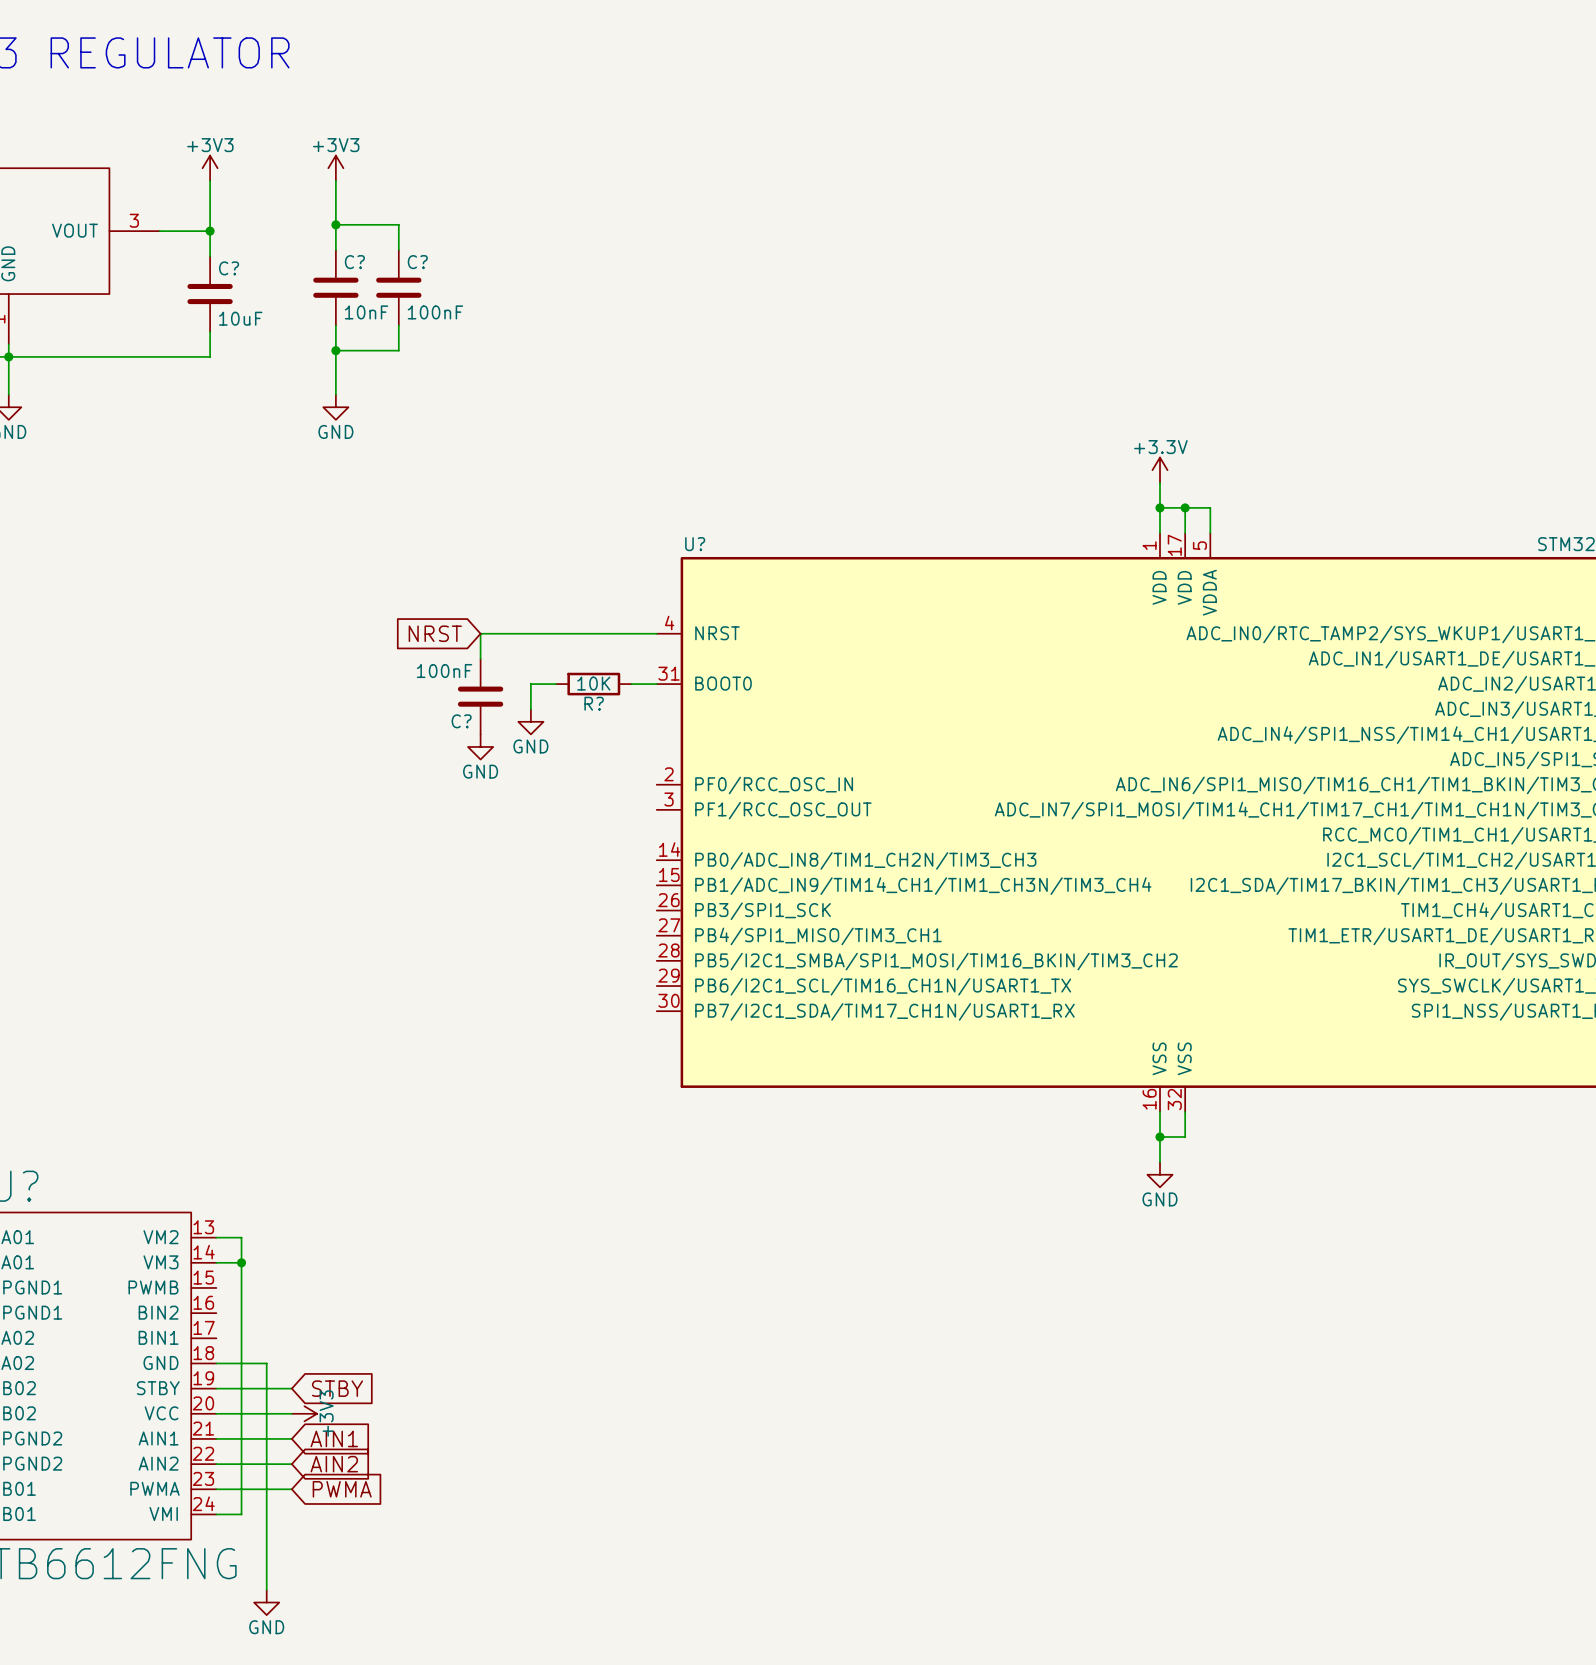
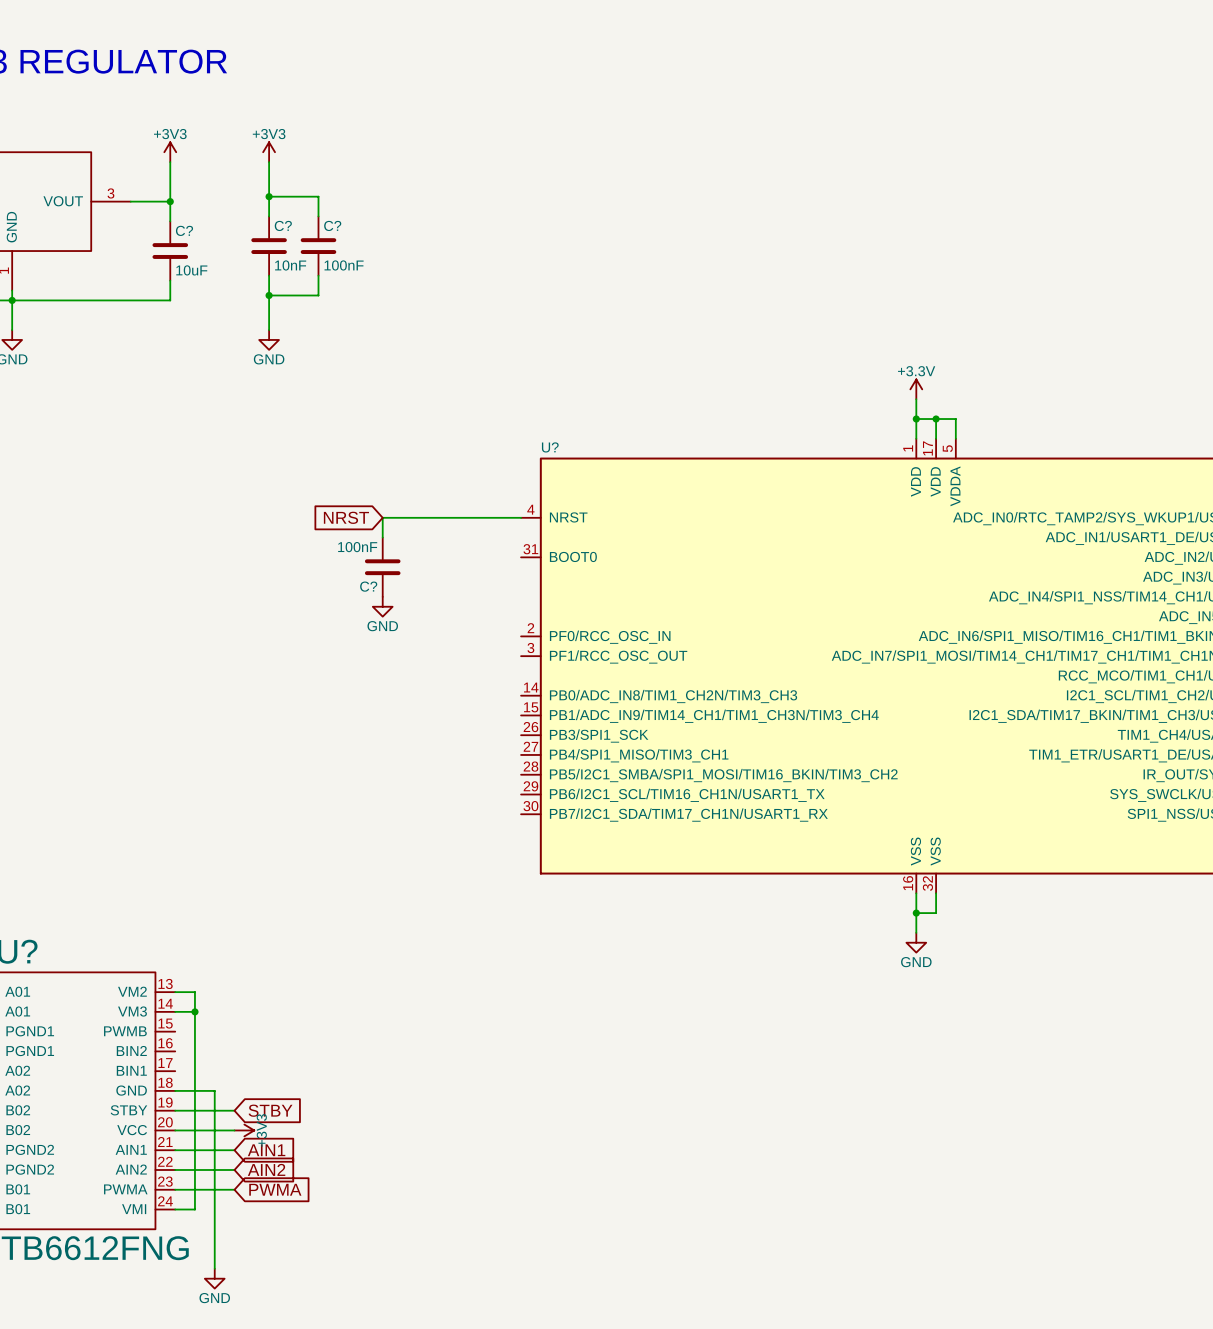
wire: (556, 684) (530, 684) (530, 709) -> none
R?: 10K (593, 684) -> none
wire: (631, 684) (656, 684) -> none
power symbol: GND (530, 721) -> none

